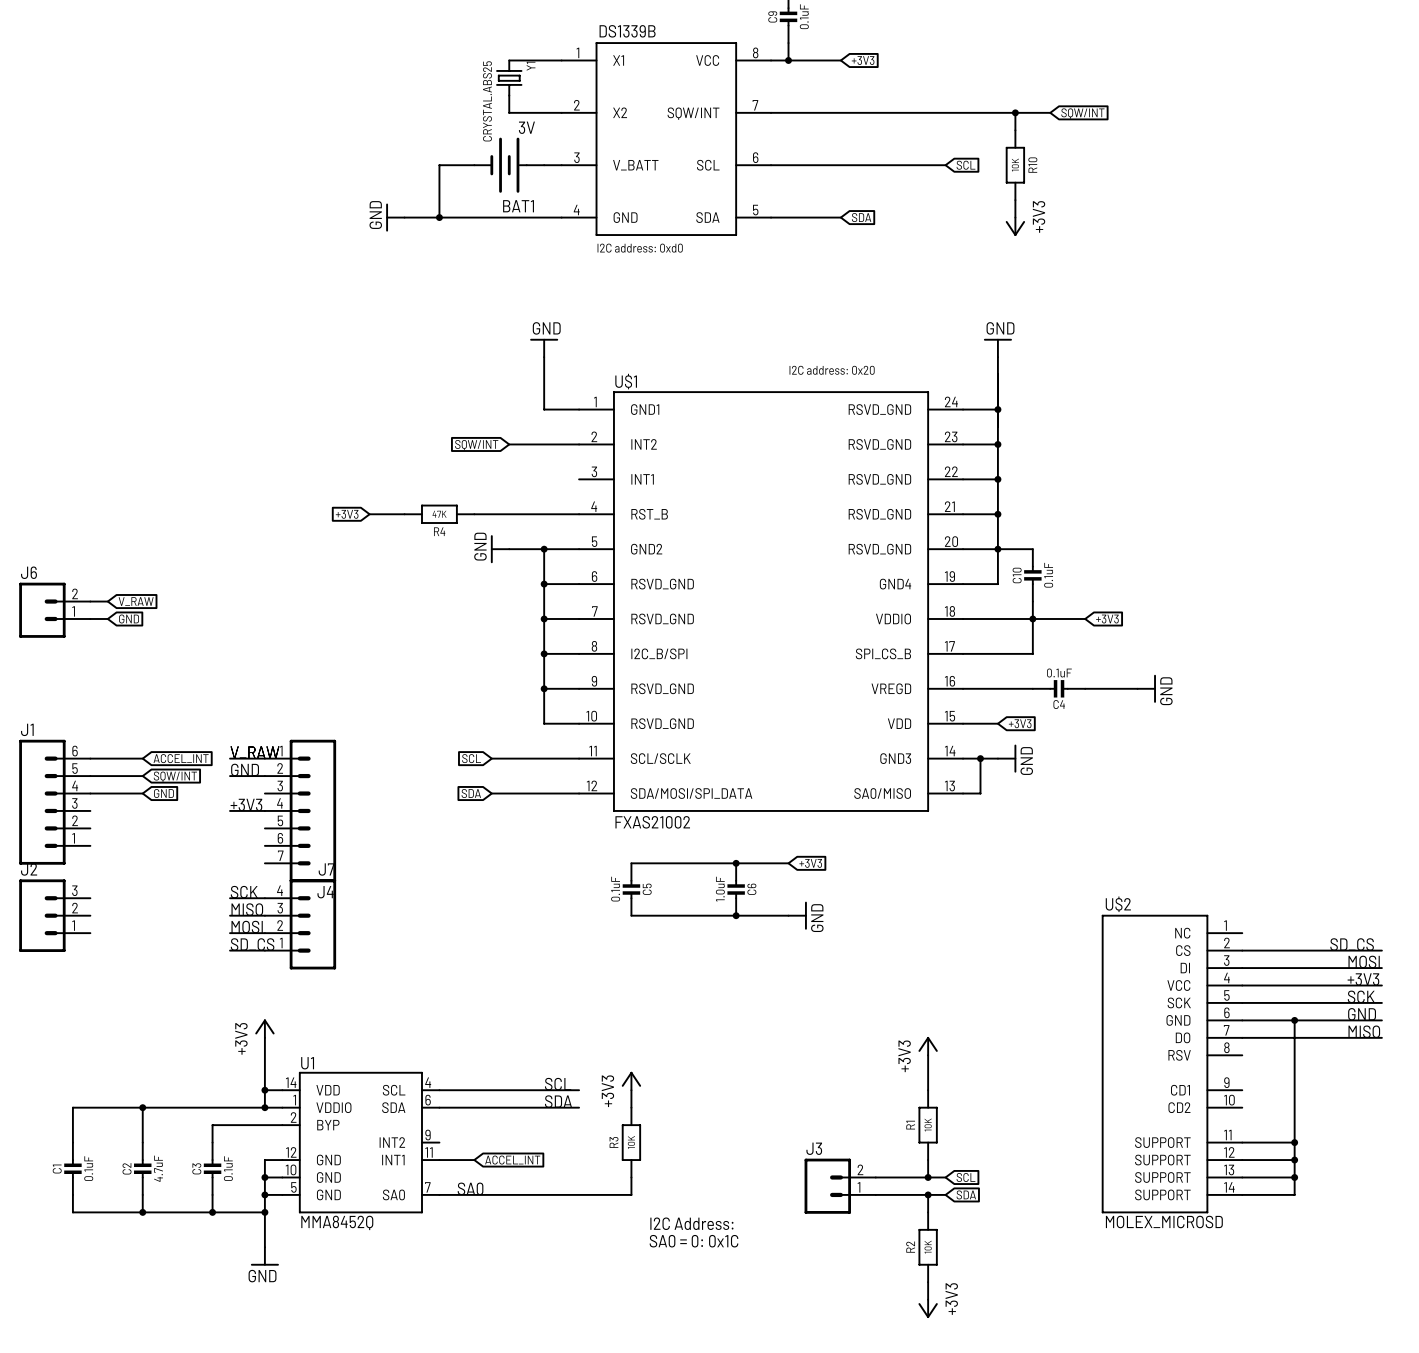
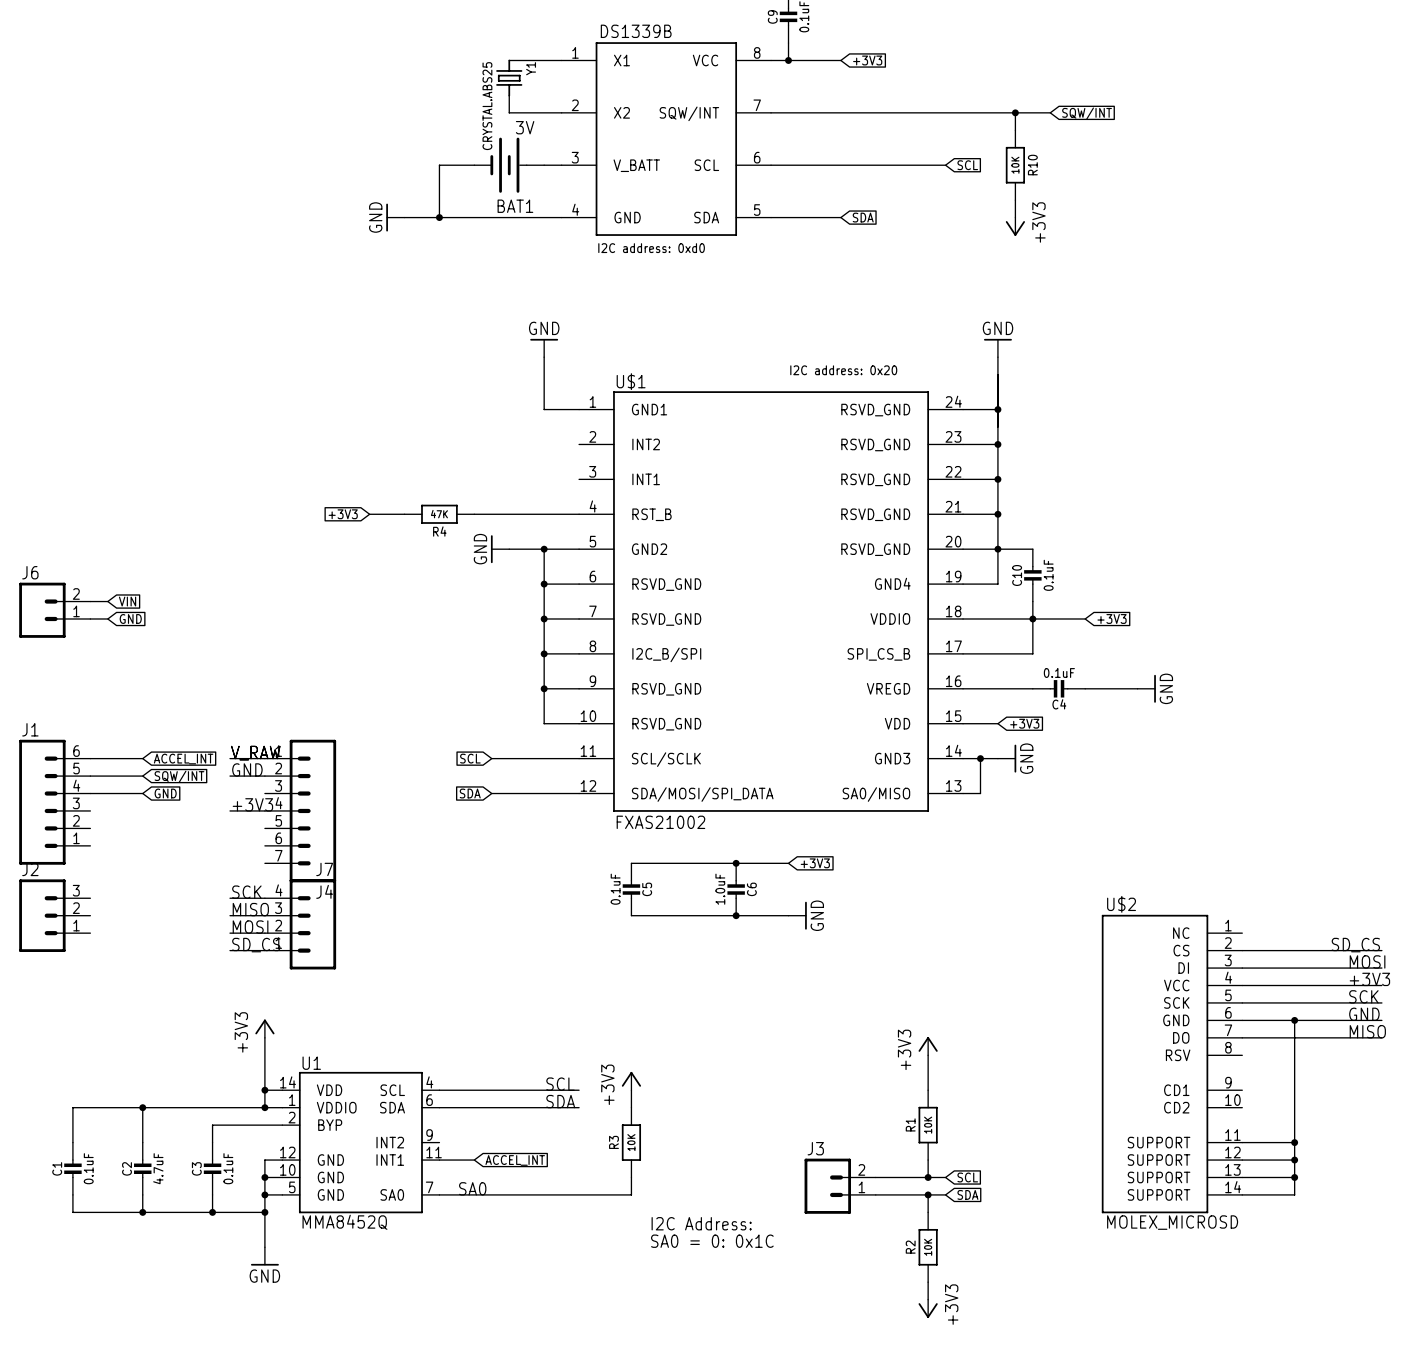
wire: (509, 444) (579, 444) -> none
global label: SQW/INT (476, 445) -> none
global label: V_RAW (136, 601) -> VIN (127, 601)

